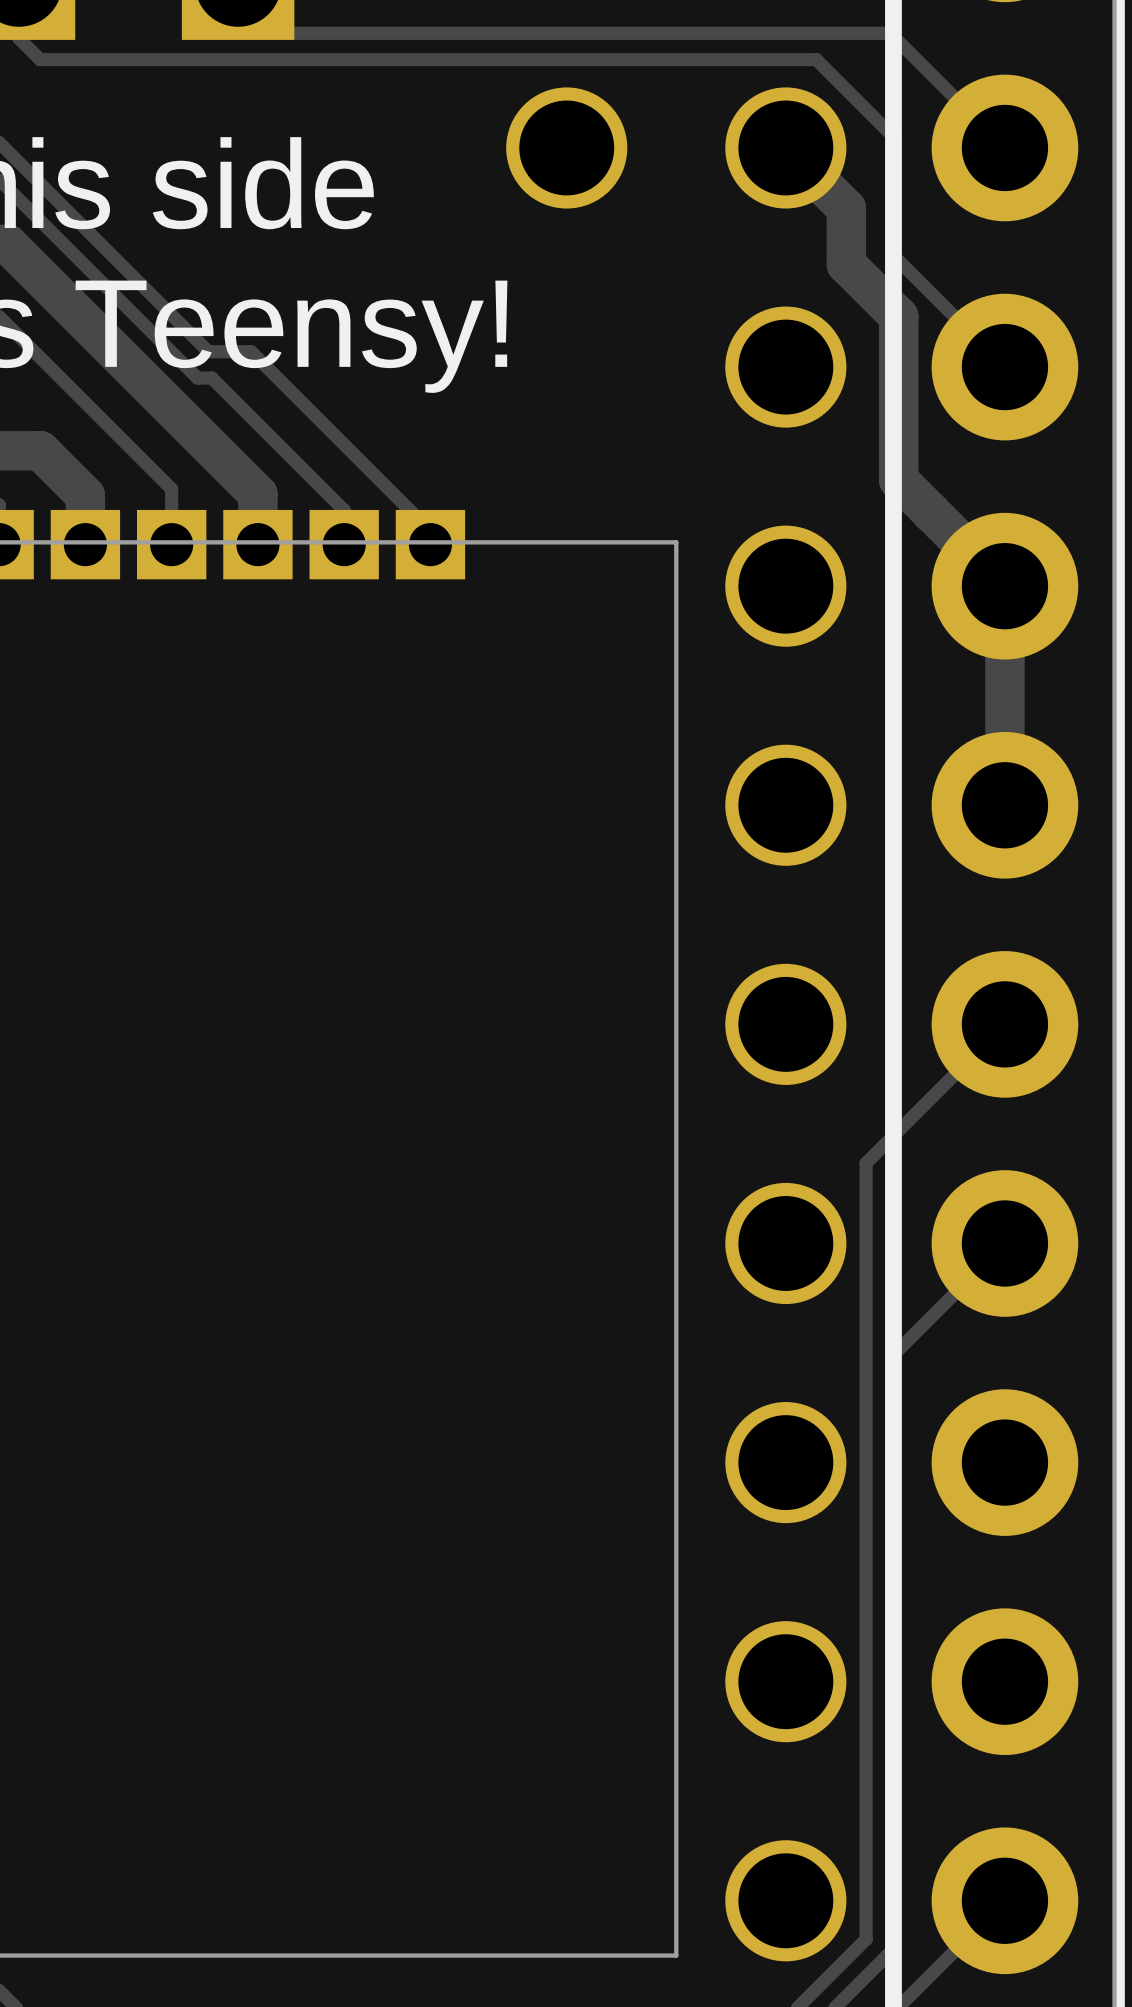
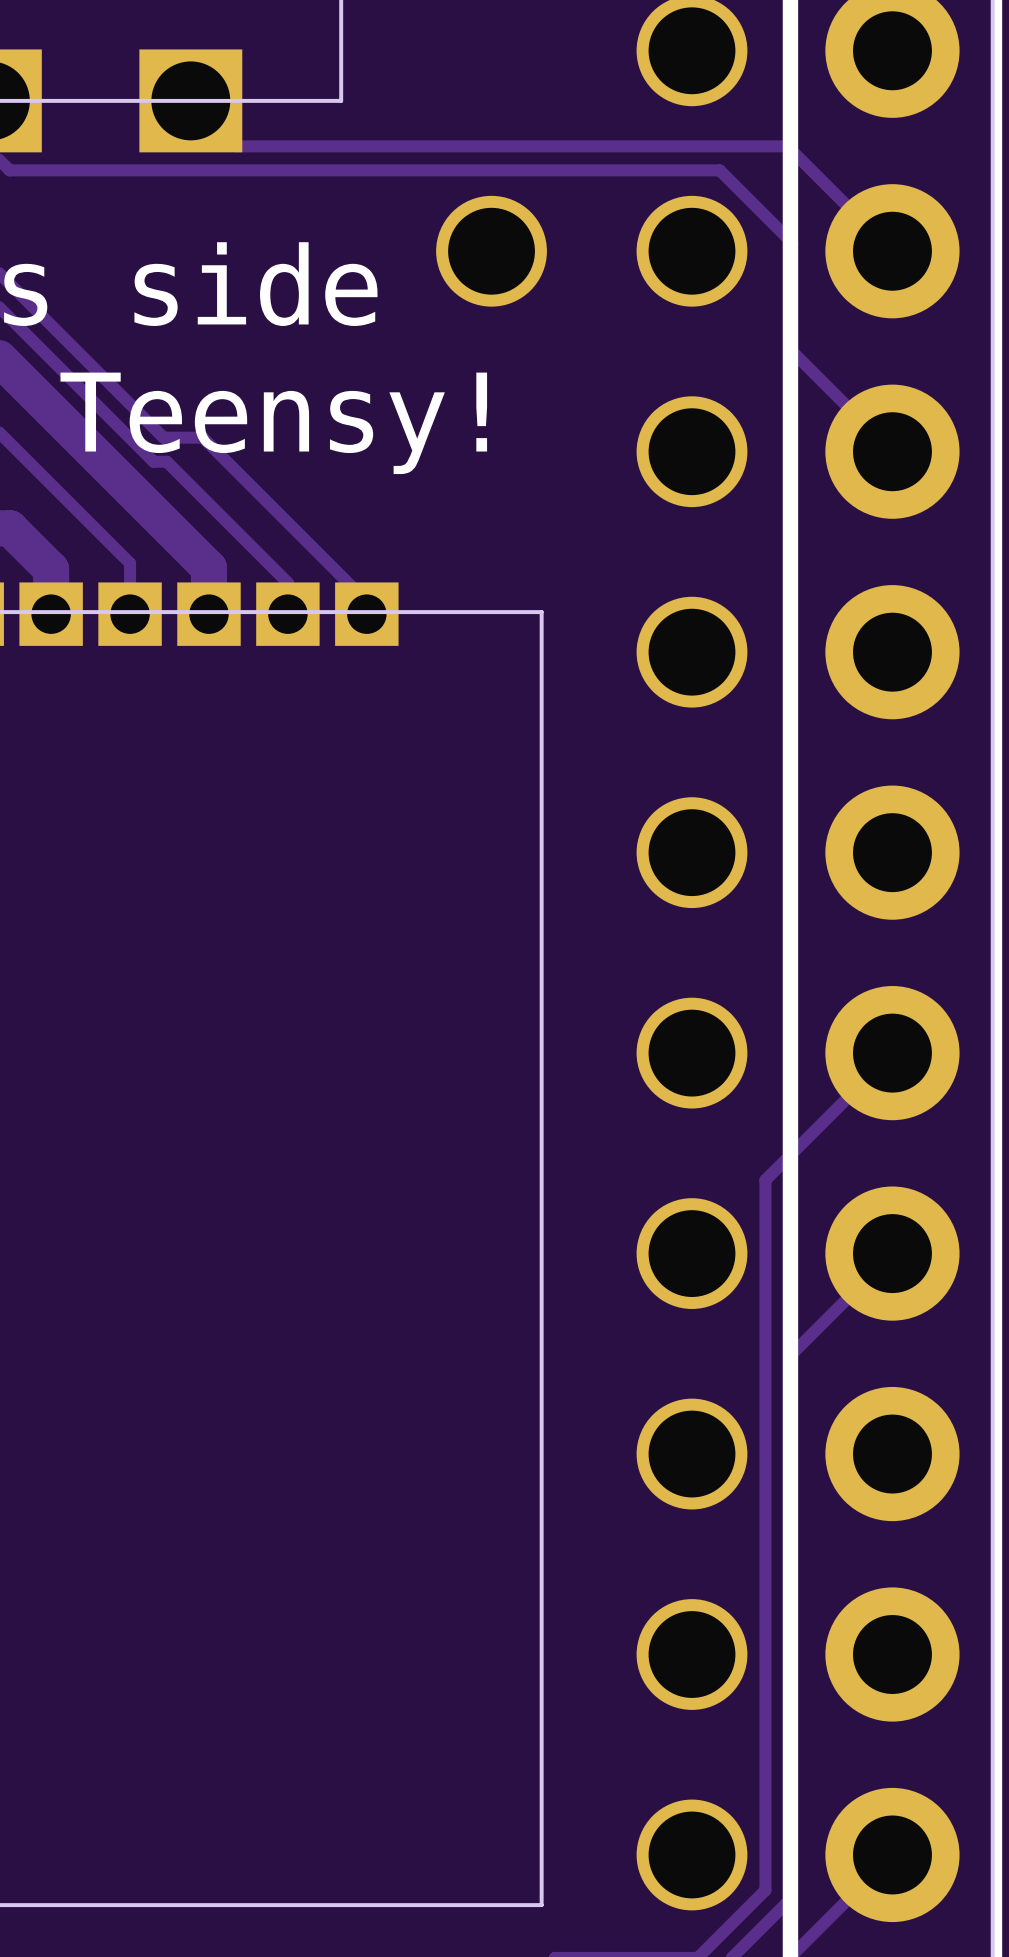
track: (785, 147) (846, 208) (846, 264) (898, 316) (898, 479) (1004, 586) (1004, 805) -> none
board edge: (621, 542) (676, 542) (676, 1955) (621, 1955) -> (541, 612) (541, 1905)

